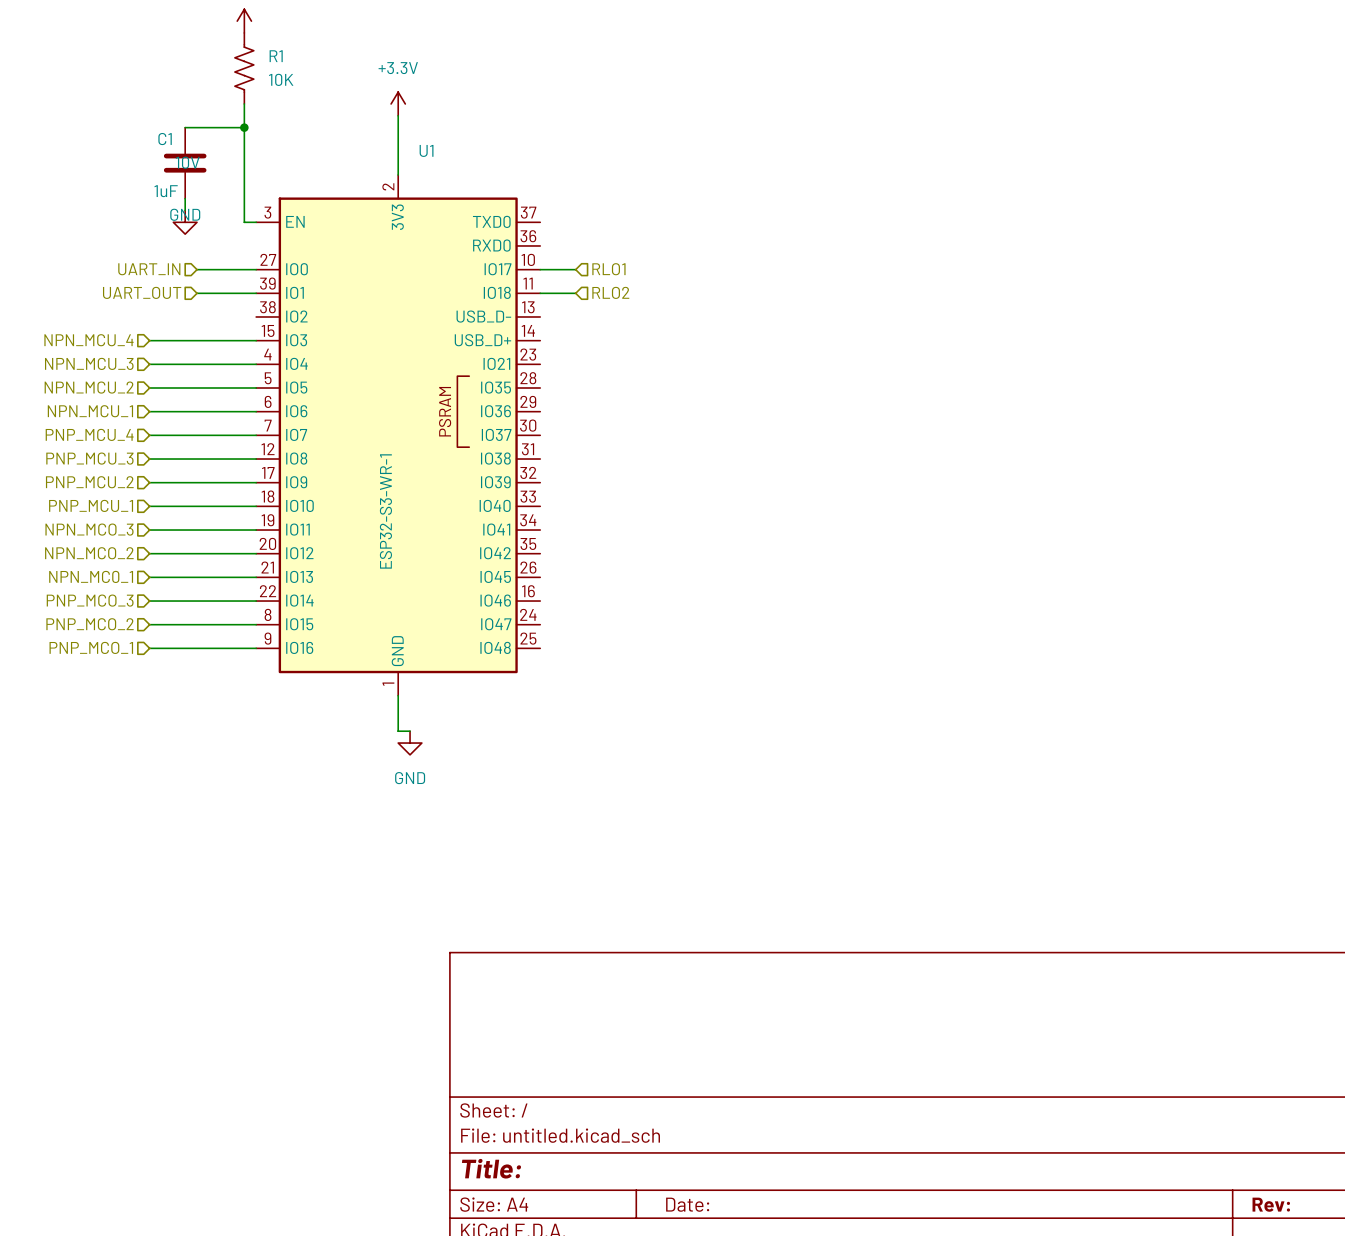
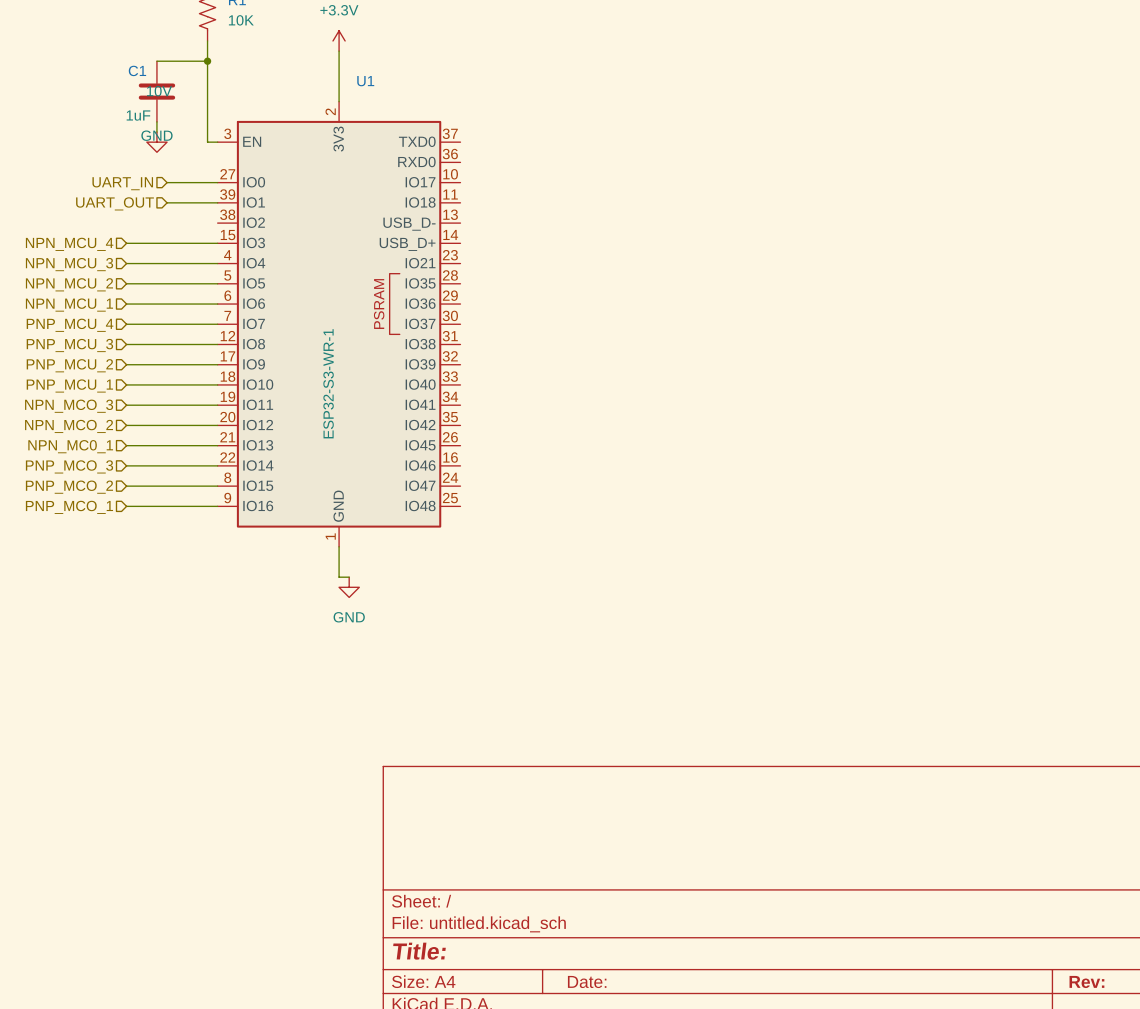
wire: (540, 269) (575, 269) -> none
hierarchical label: RLO1 (608, 269) -> none
hierarchical label: RLO2 (610, 292) -> none
wire: (540, 293) (575, 293) -> none

